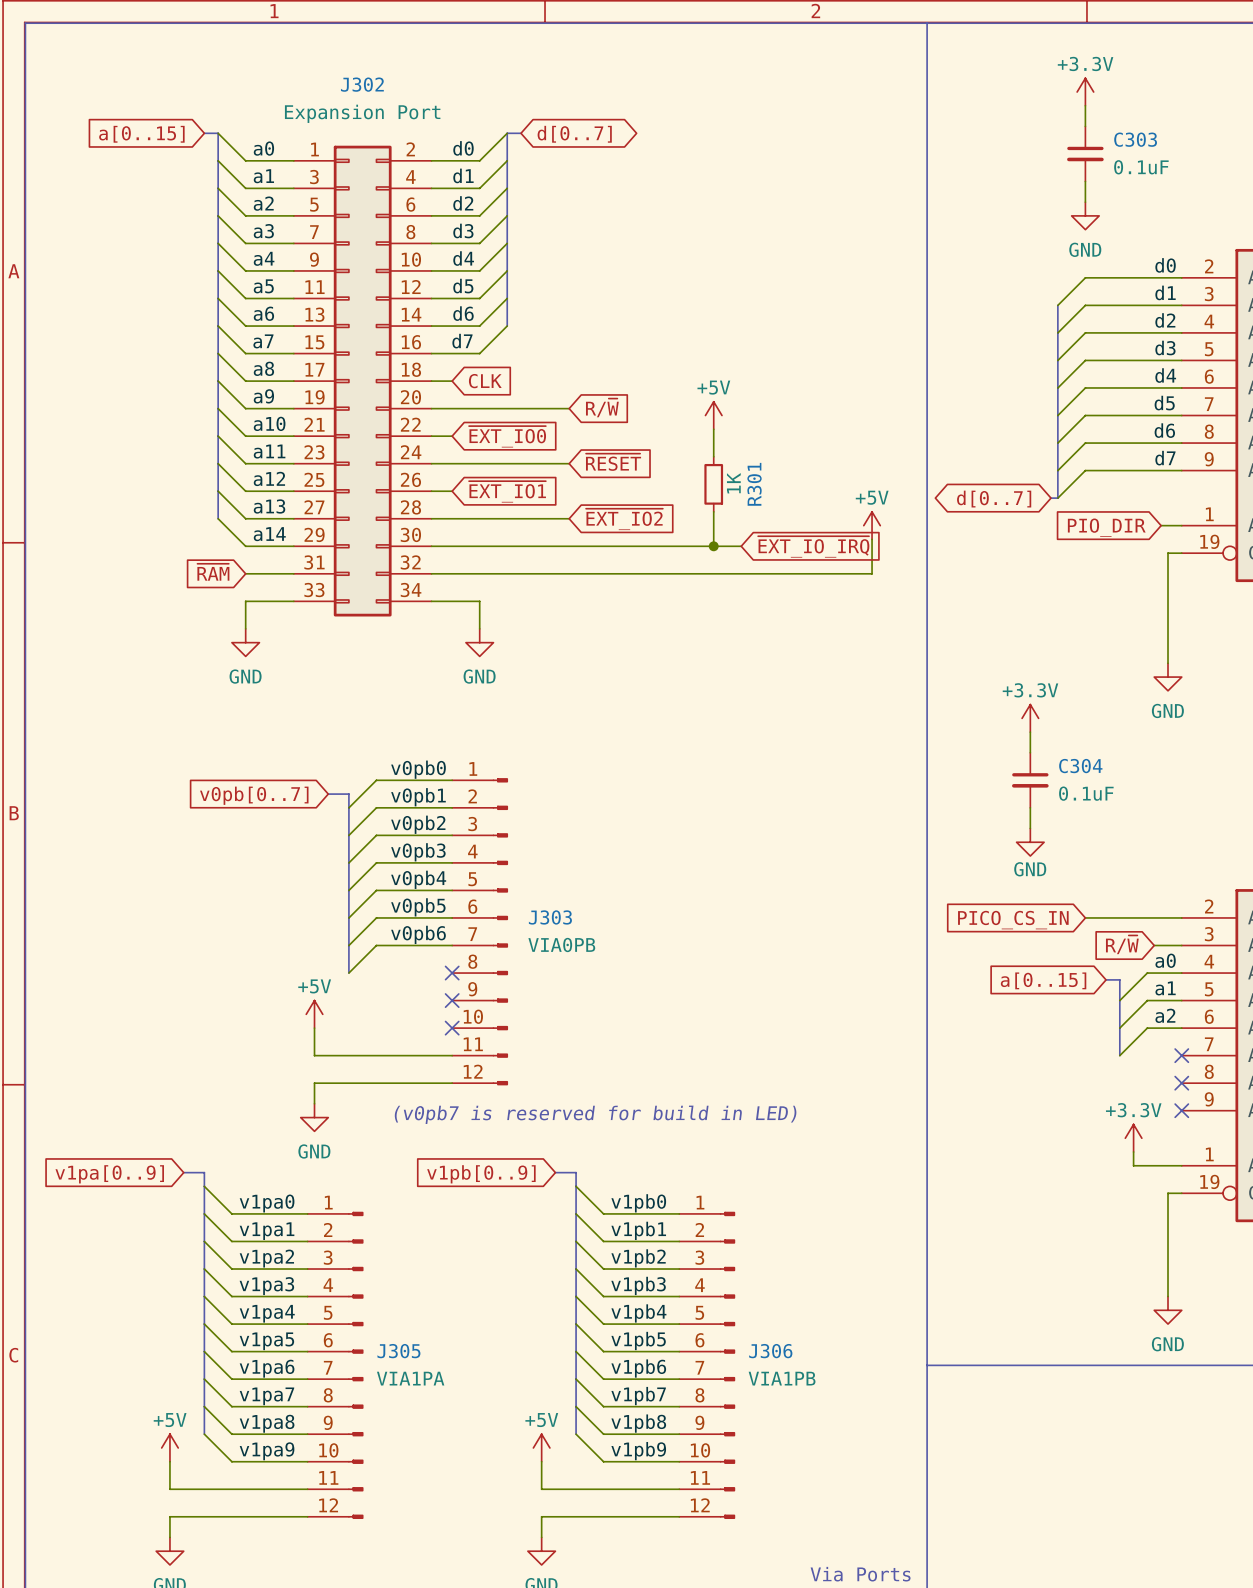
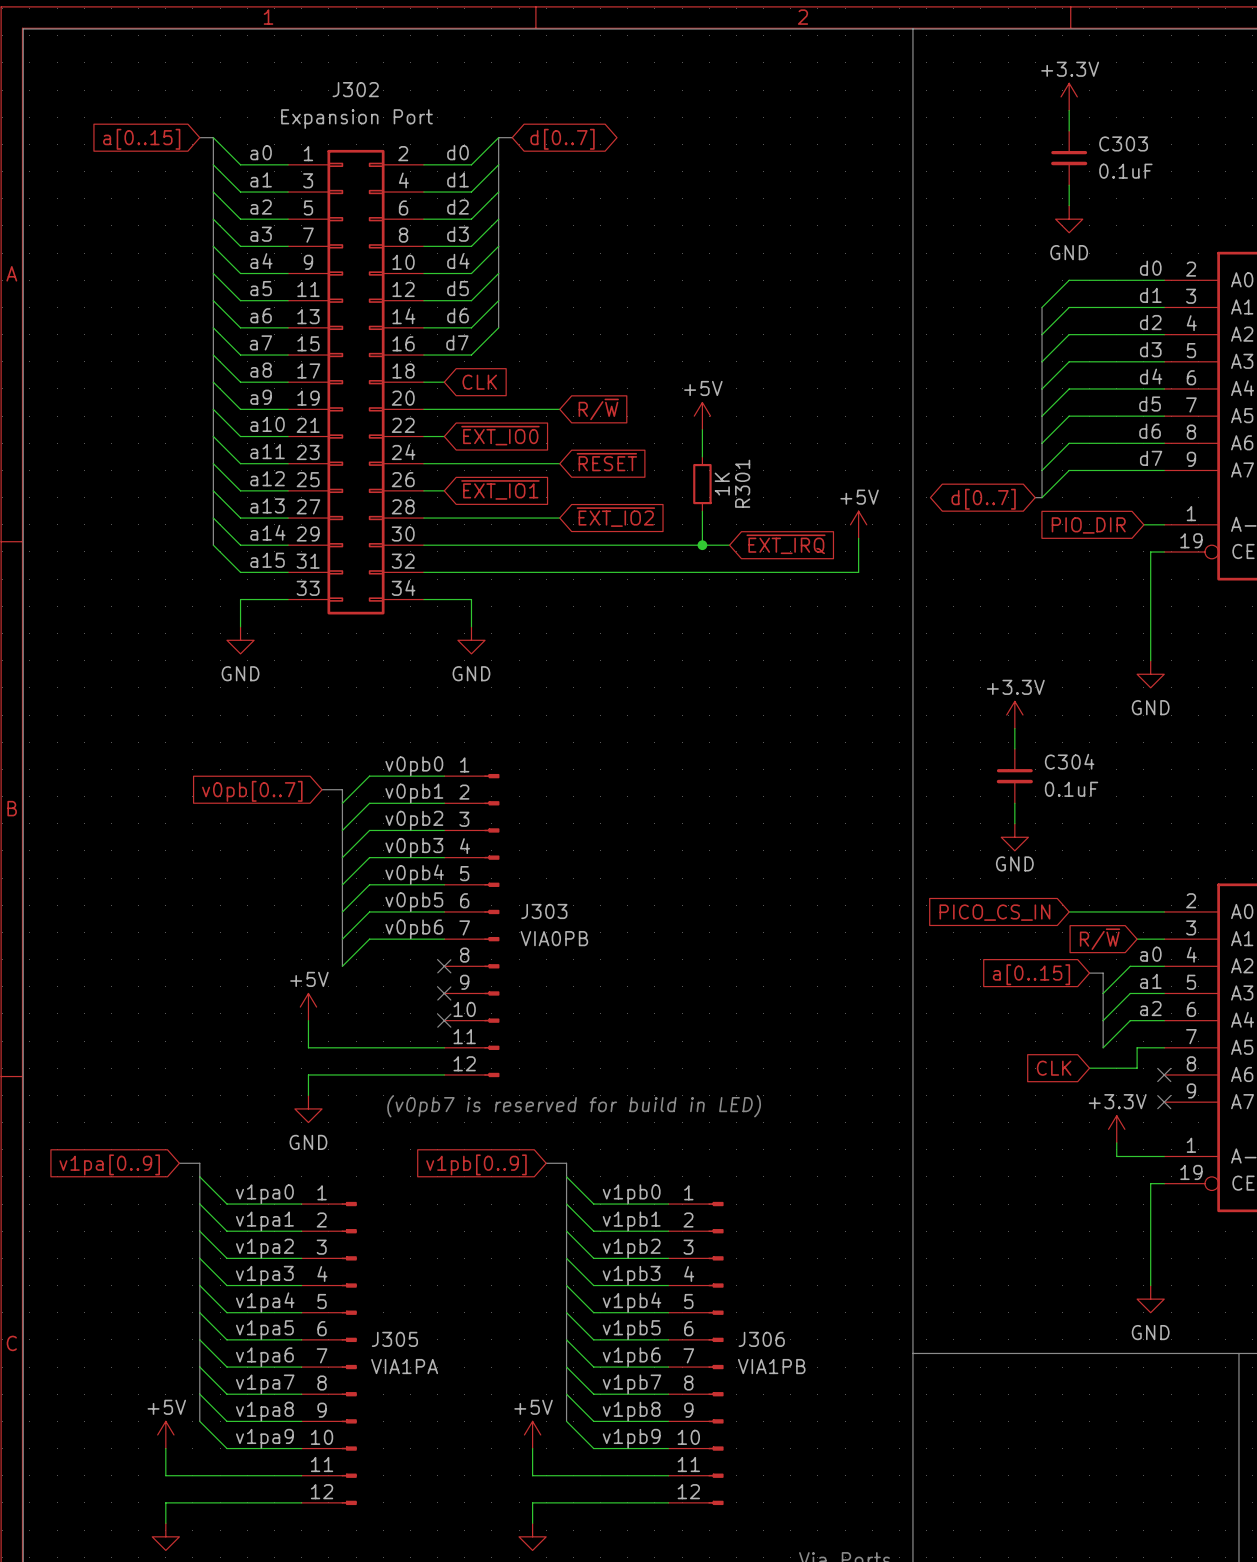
bus: none -> (213, 518) (213, 545)
wire: none -> (213, 545) (240, 572)
global label: ~{EXT_IO_IRQ} (813, 546) -> ~{EXT_IRQ} (786, 544)
label: none -> a15 (267, 560)
global label: ~{RAM} (213, 572) -> none
wire: none -> (1164, 1047) (1137, 1047) (1137, 1068) (1089, 1068)
no-connect mark: (1181, 1055) -> none
global label: none -> CLK (1054, 1068)

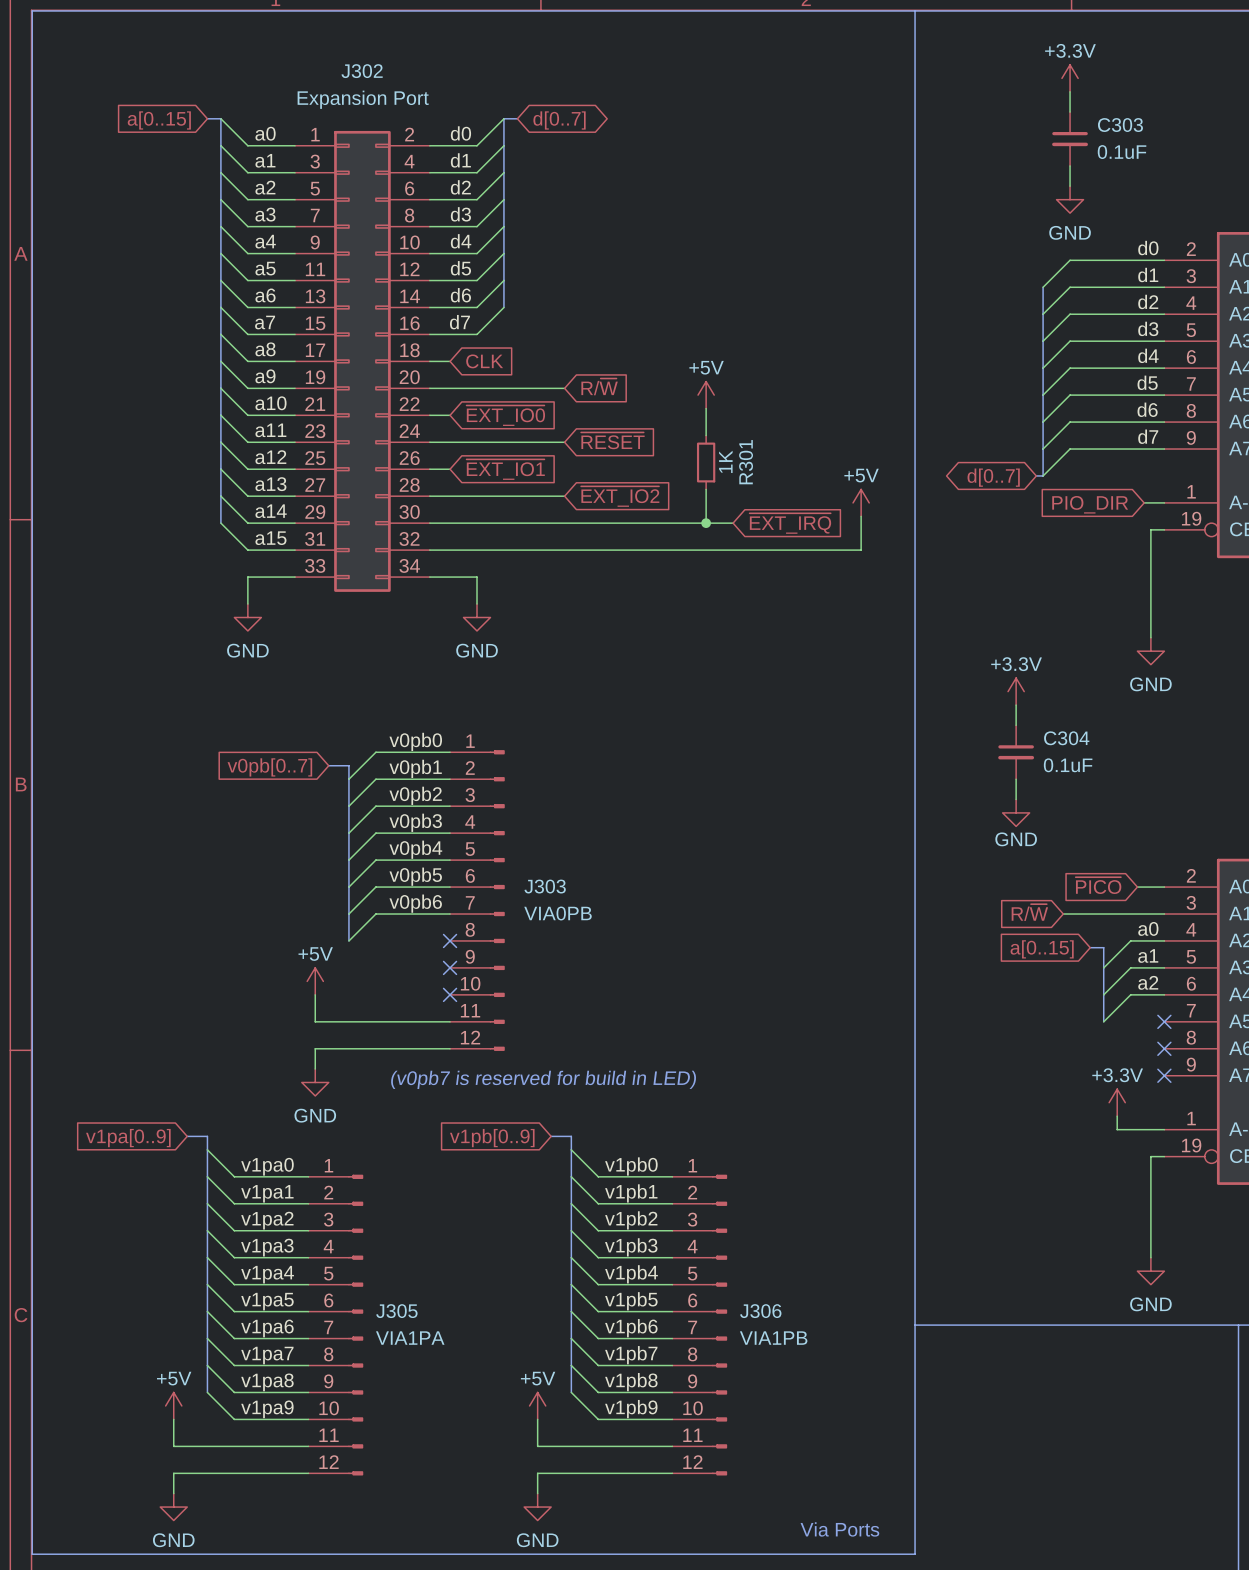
global label: none -> ~{PICO} (1098, 885)
wire: (1069, 911) (1137, 911) -> none
global label: PICO_CS_IN (994, 912) -> none
wire: none -> (1063, 914) (1137, 914)
global label position: R/~{W} (1100, 939) -> R/~{W} (1029, 912)
wire: (1164, 1047) (1137, 1047) (1137, 1068) (1089, 1068) -> none
no-connect mark: none -> (1164, 1021)
global label: CLK (1054, 1068) -> none

